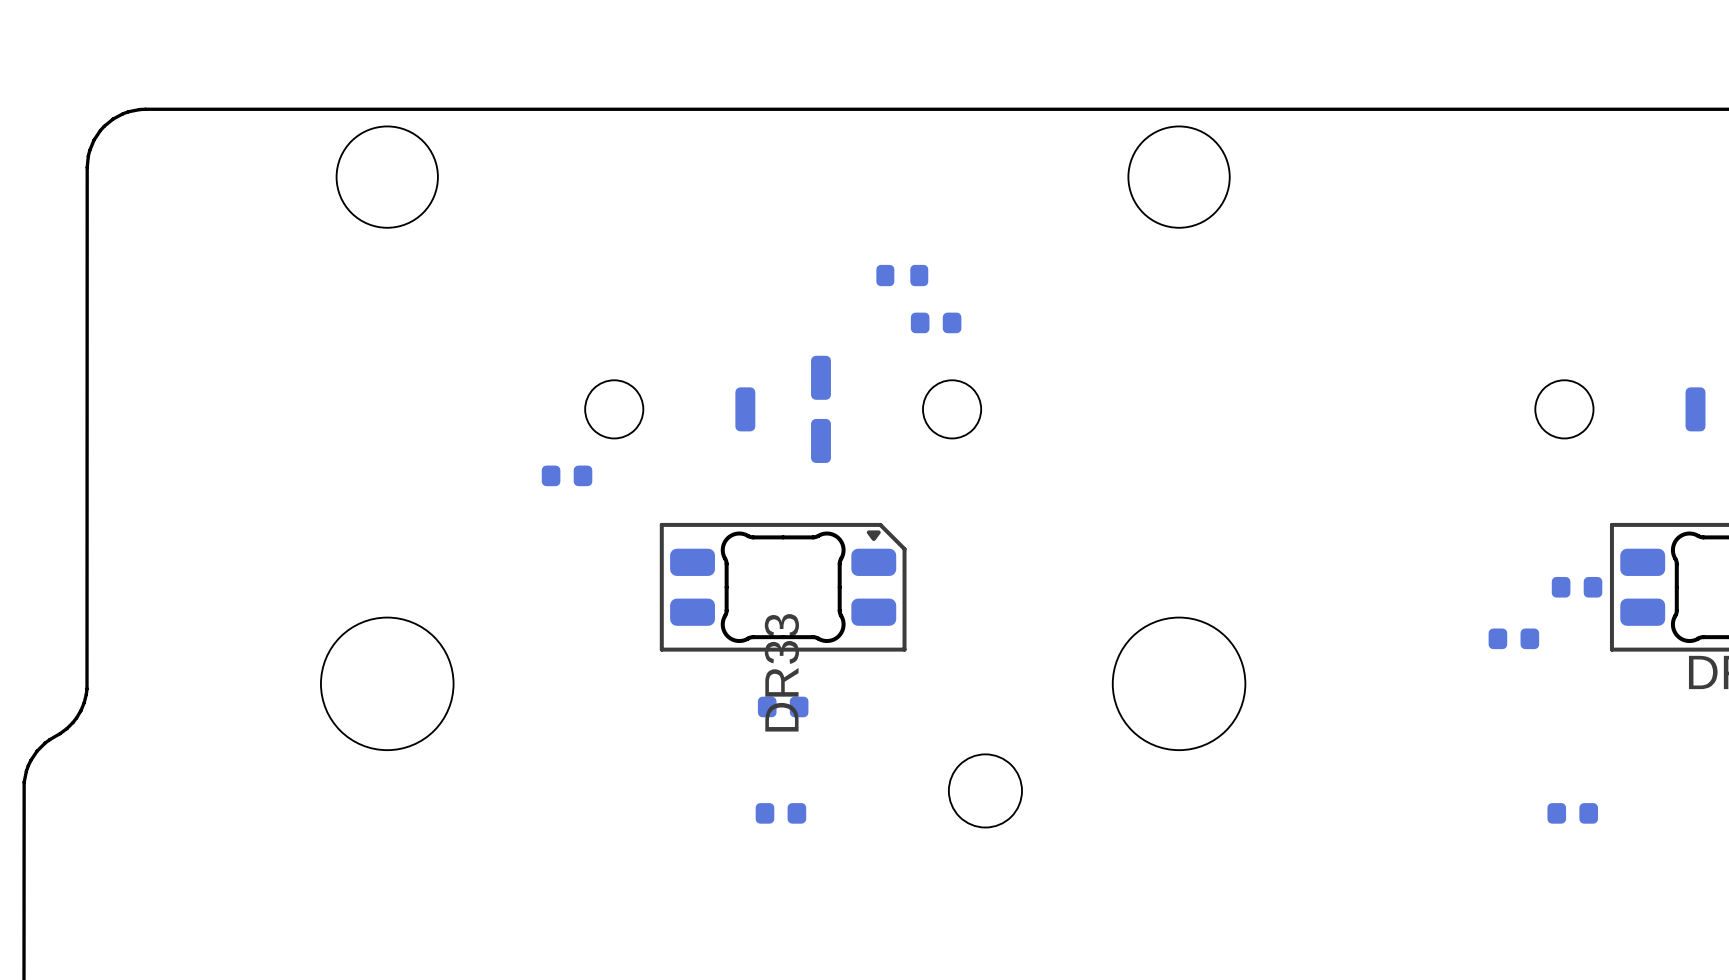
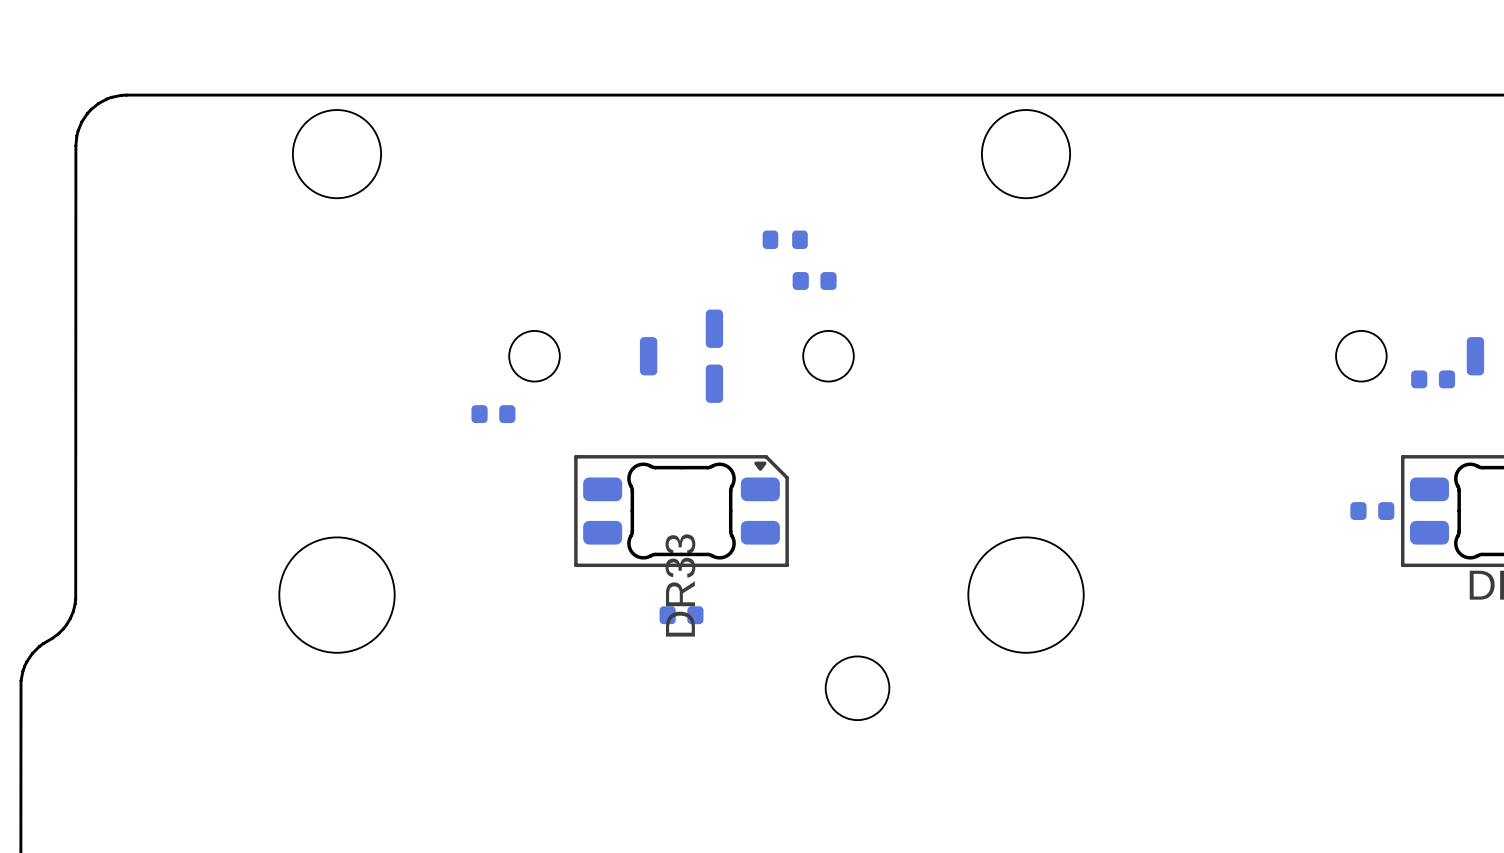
part: none -> (1433, 379)
part: (1513, 638) -> none
part: (780, 813) -> none
part: (1572, 813) -> none

